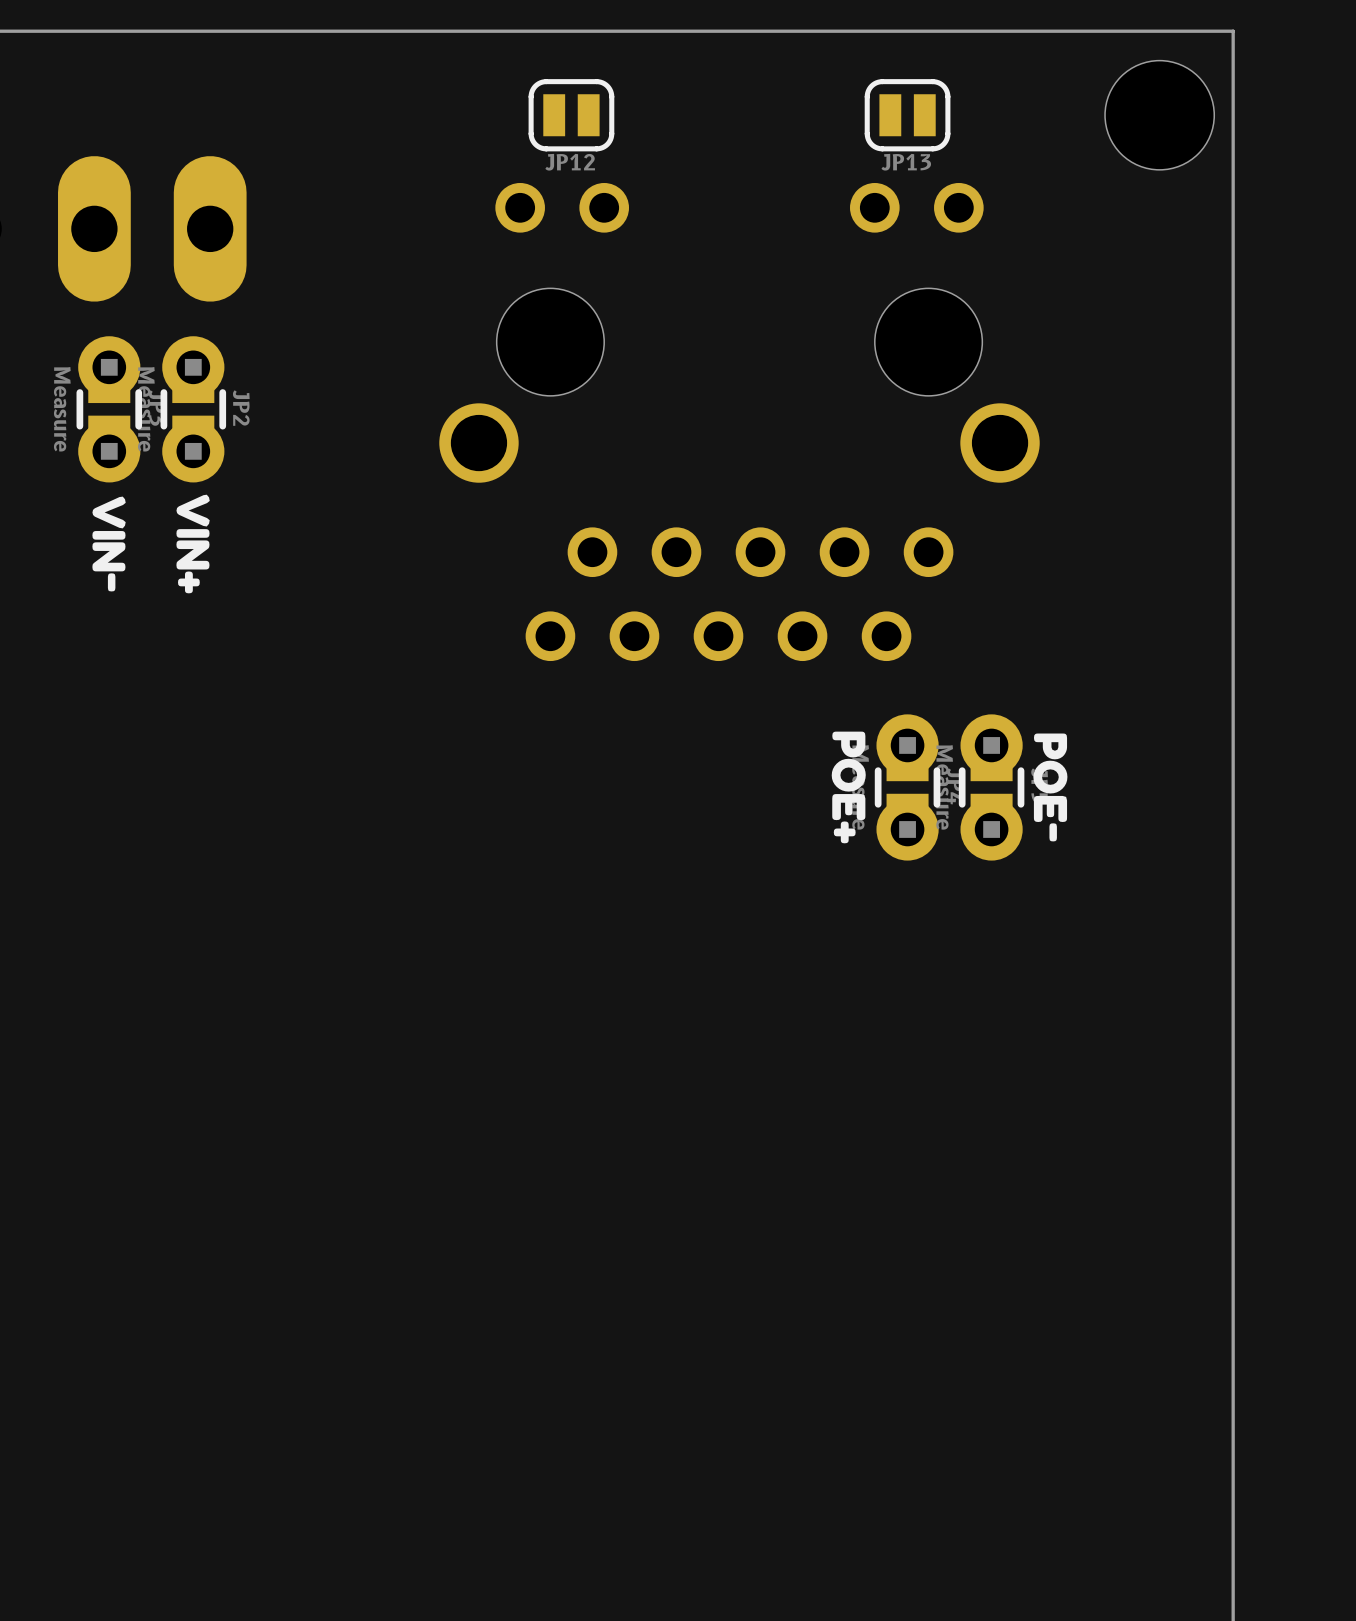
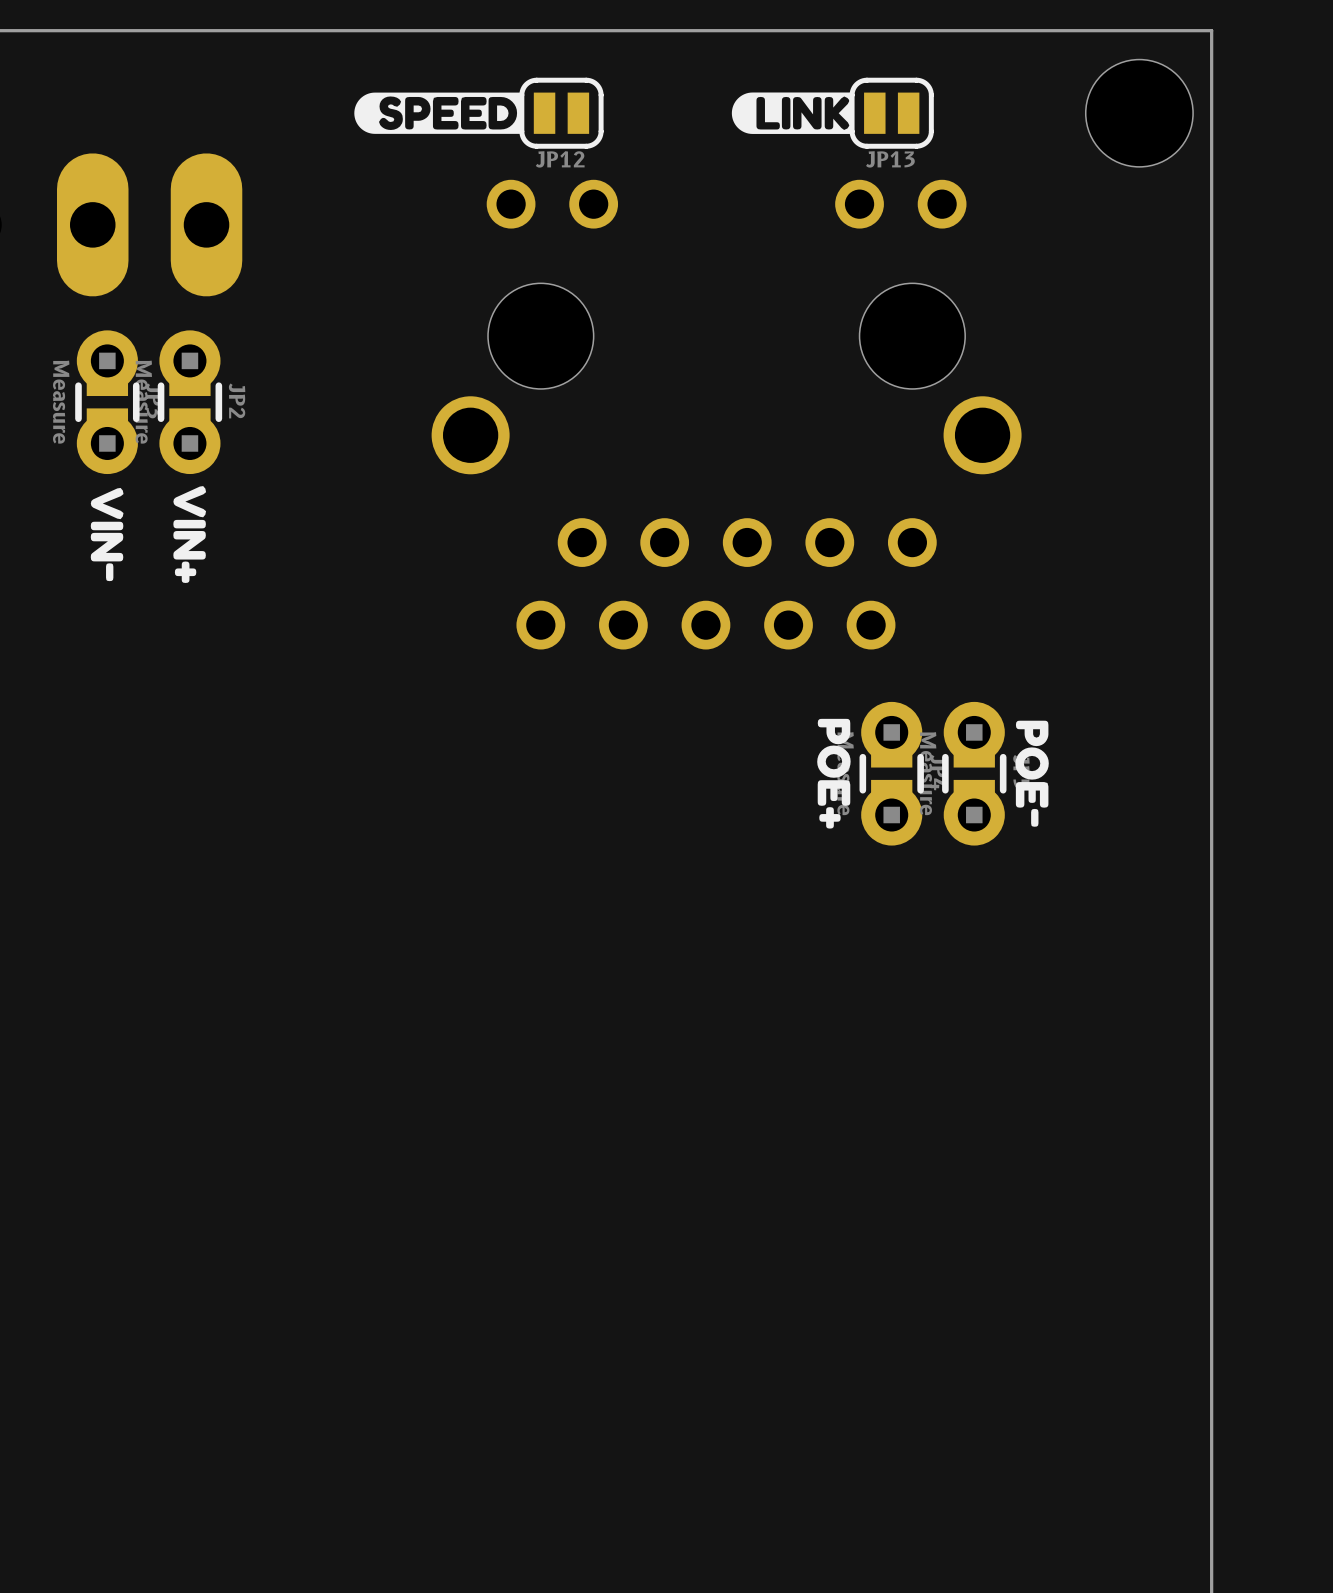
drawing: none -> [354, 92, 521, 134]
drawing: none -> [731, 92, 854, 134]

